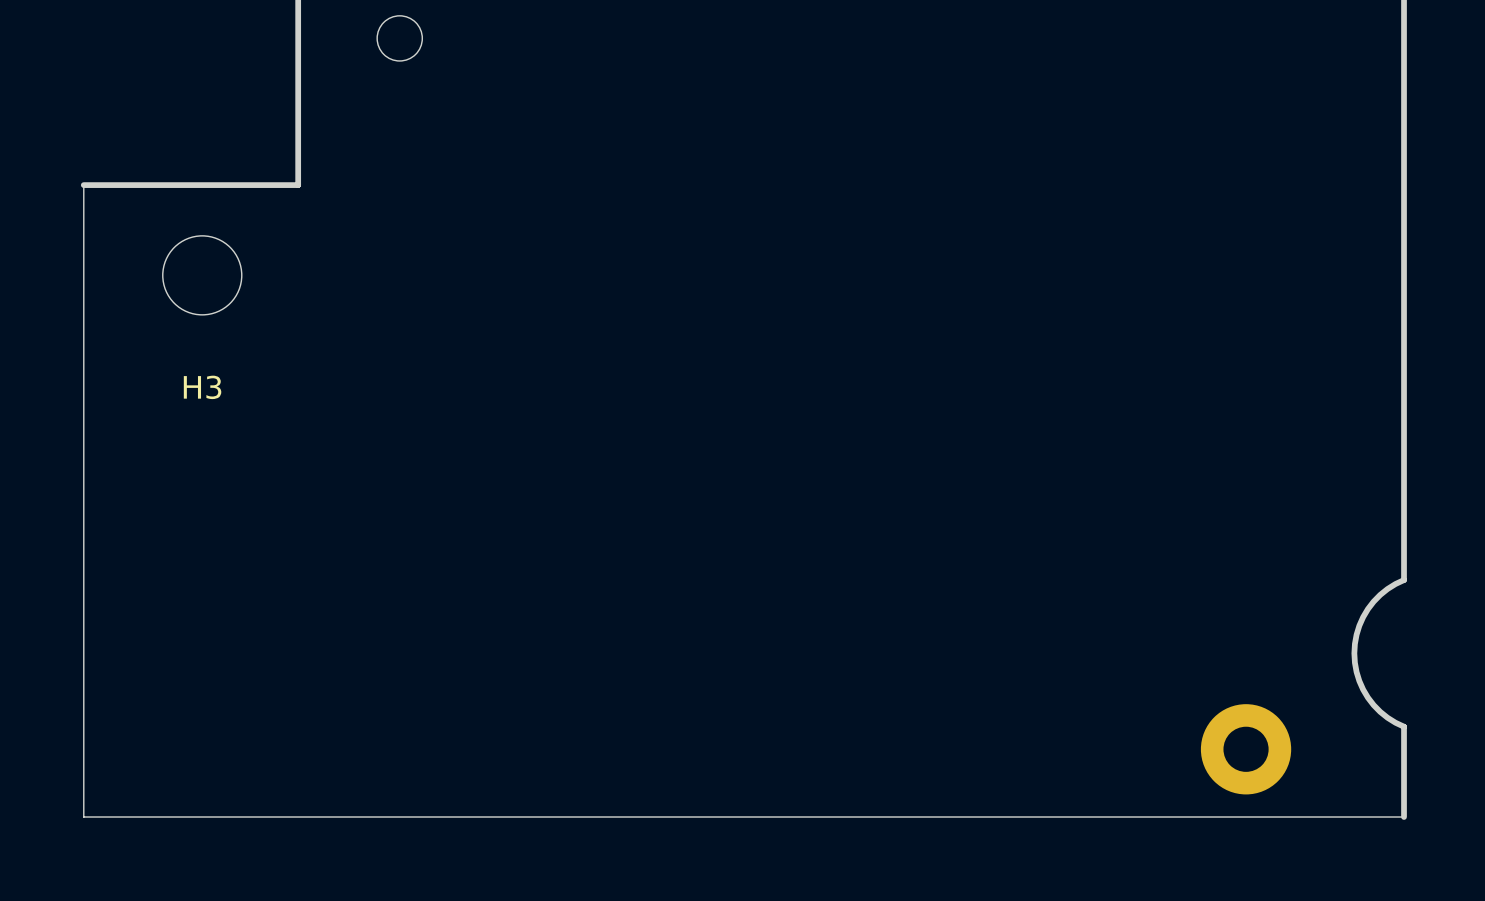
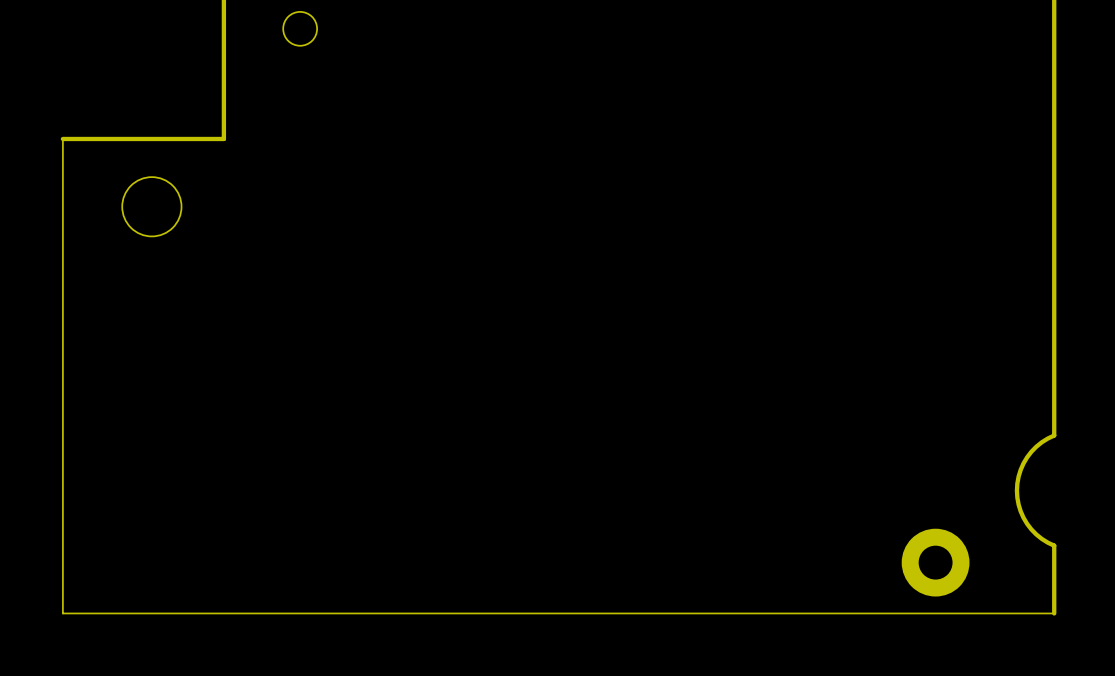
H3 name: H3 (202, 387) -> none

